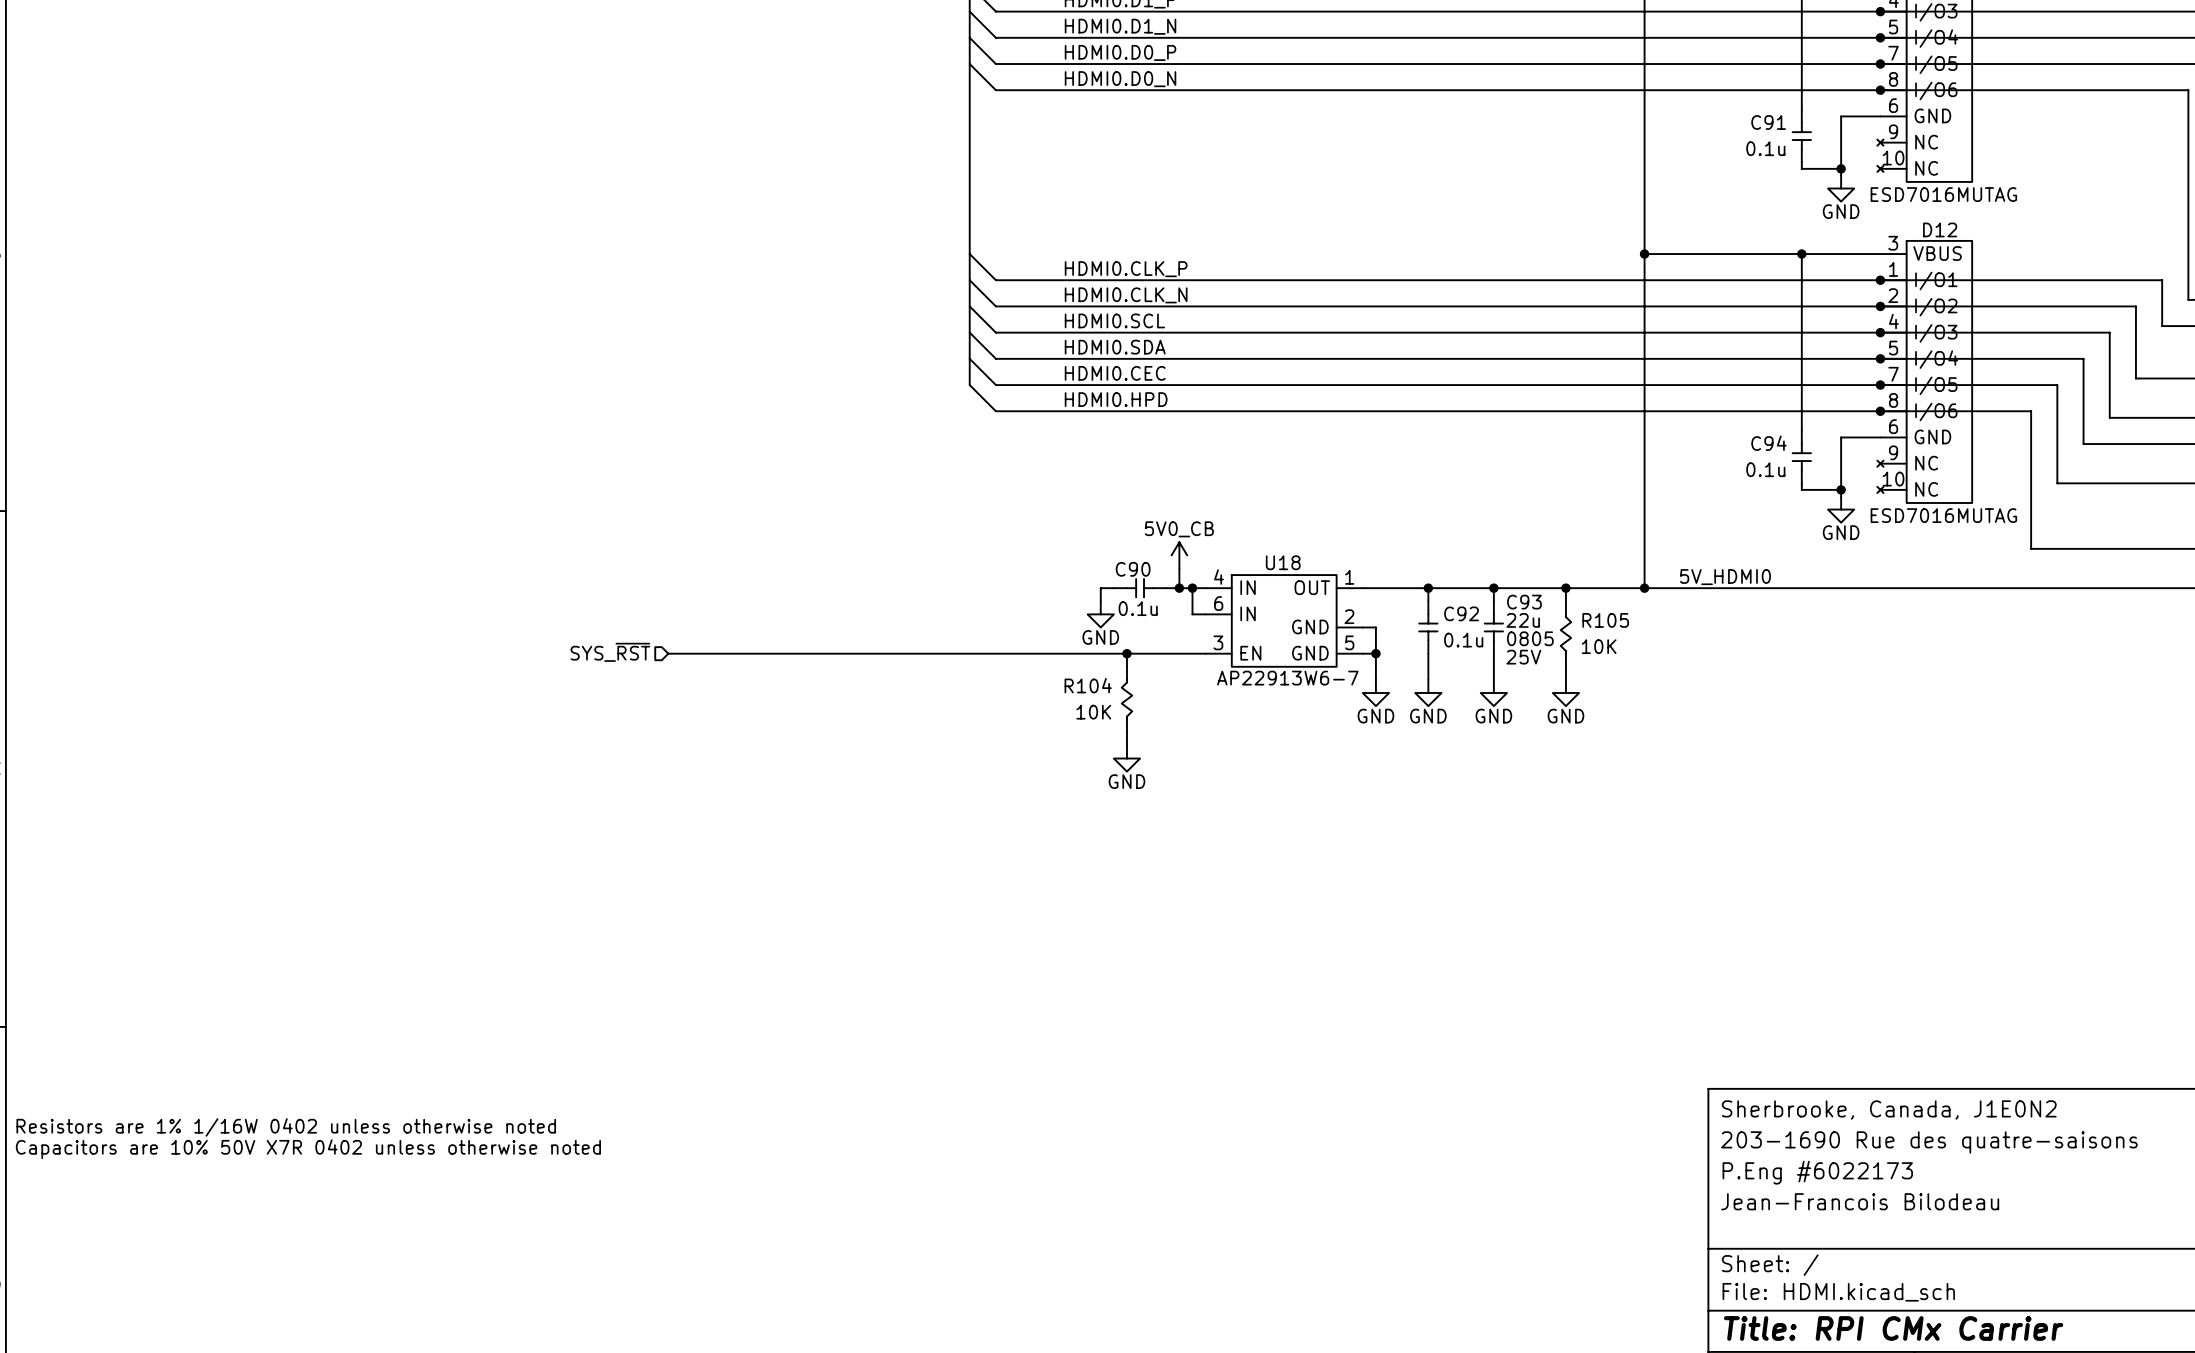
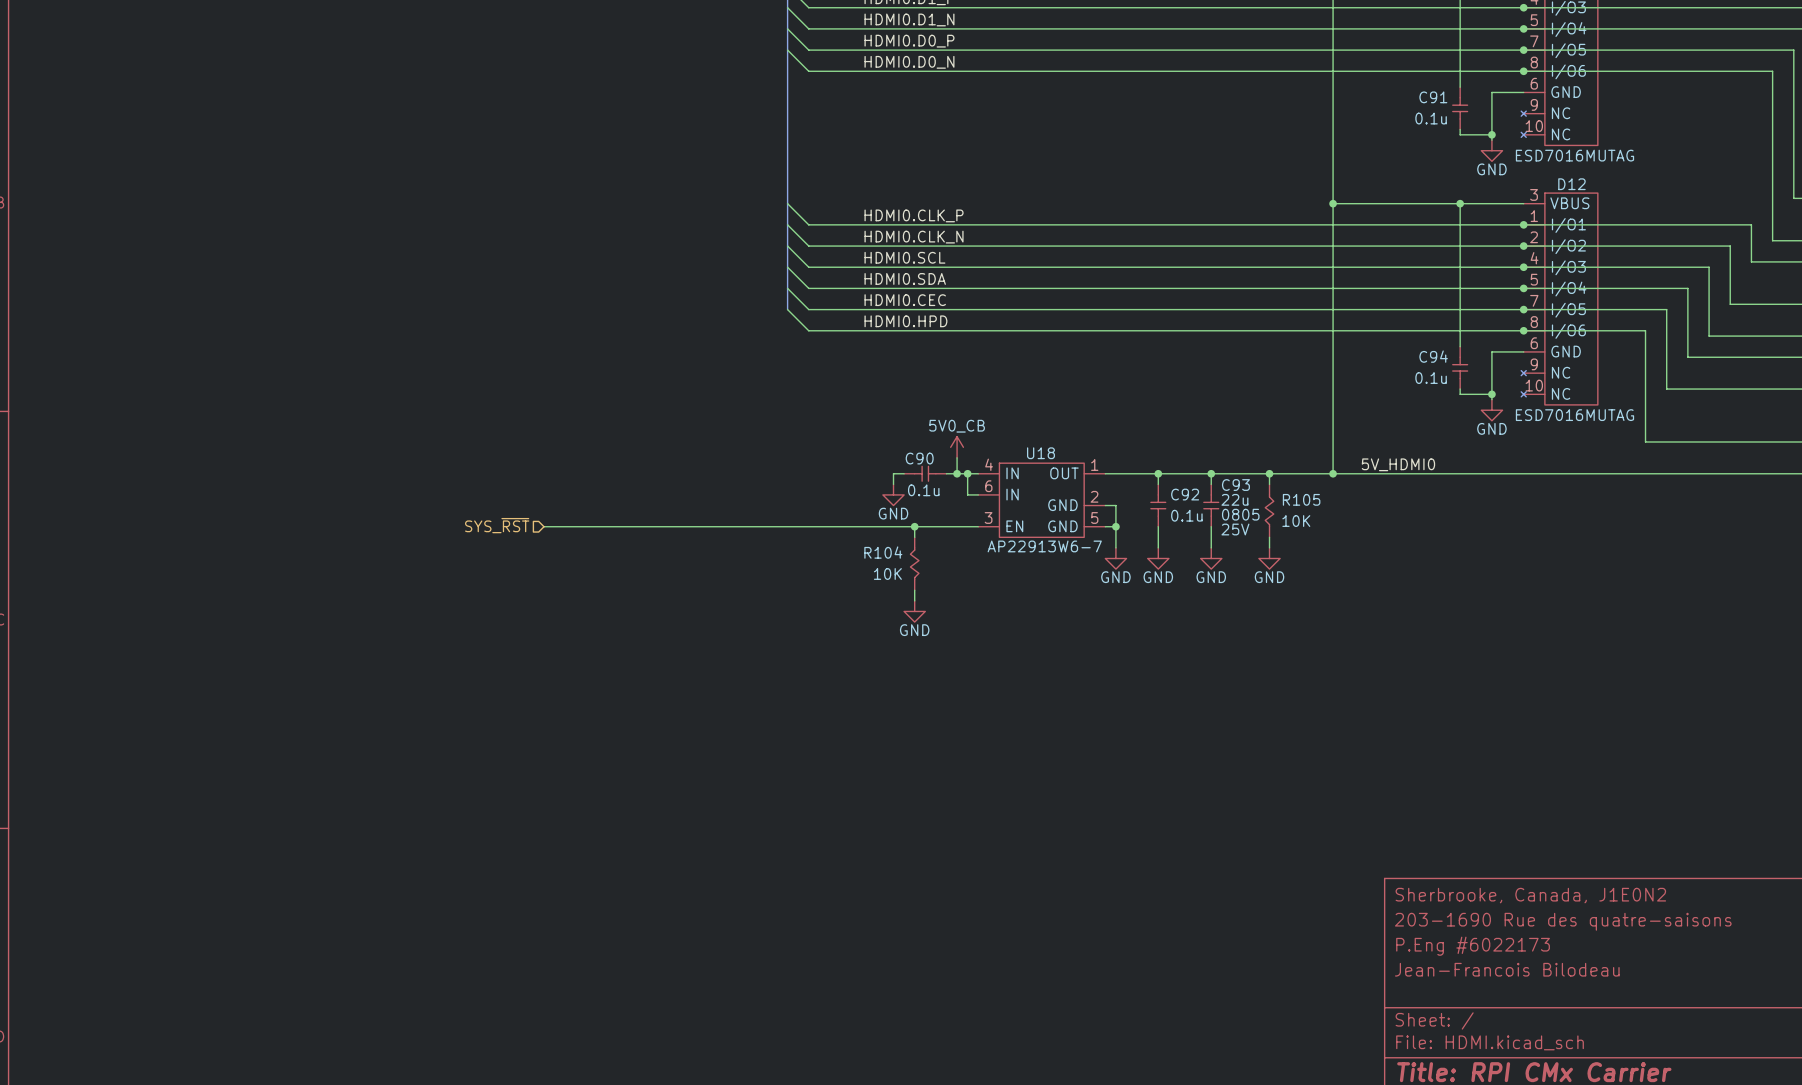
text: Resistors are 1% 1/16W 0402 unless otherwise noted (286, 1127) -> none
text: Capacitors are 10% 50V X7R 0402 unless otherwise noted (308, 1149) -> none

